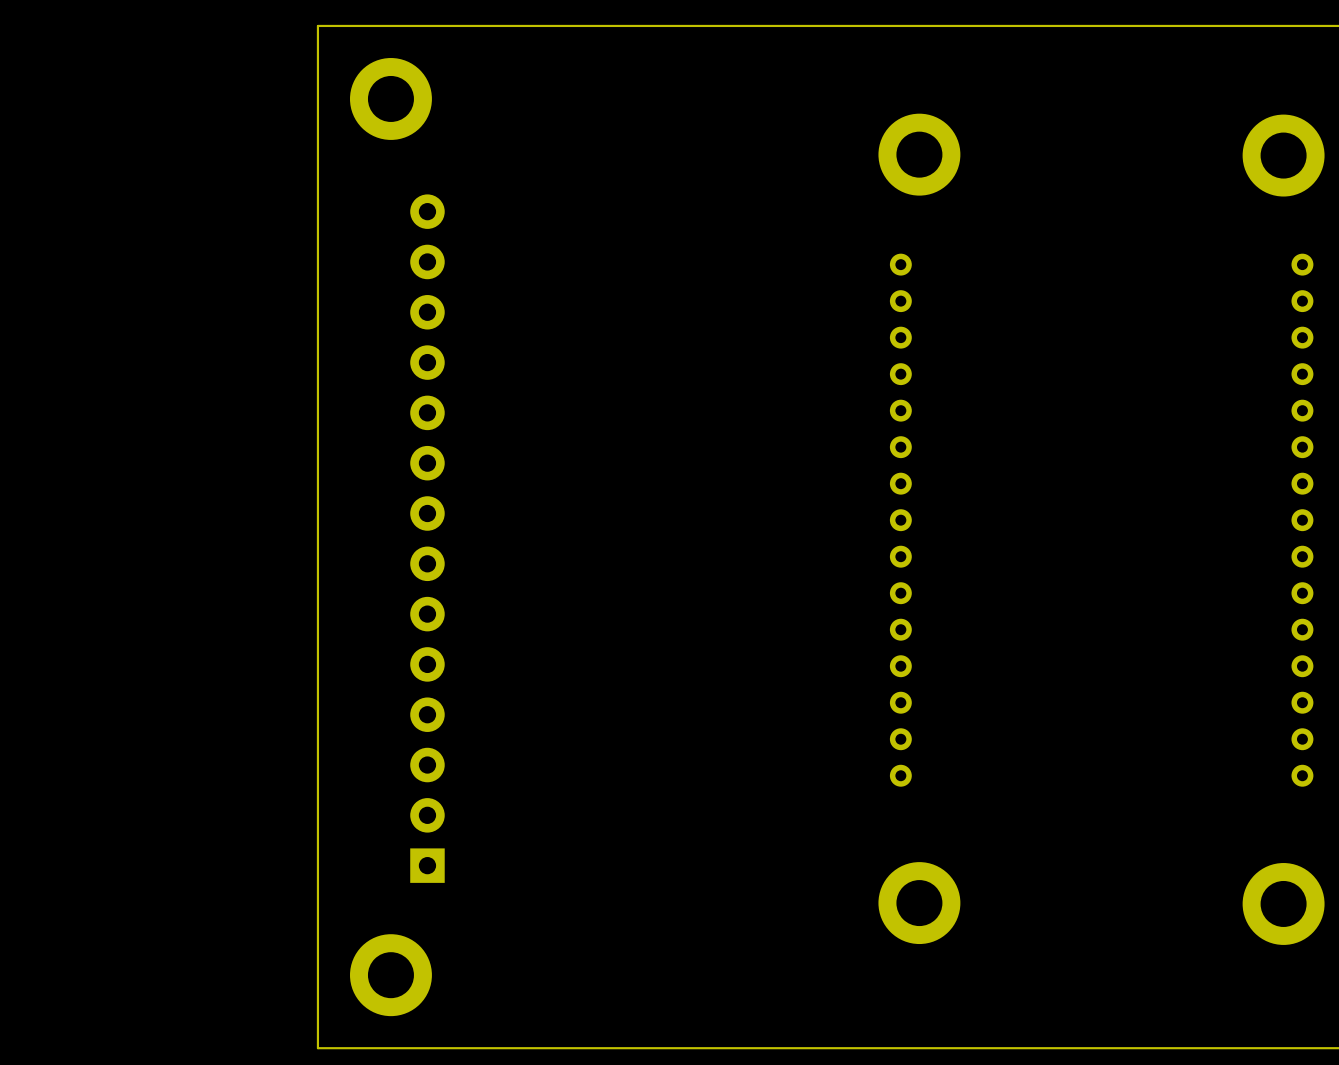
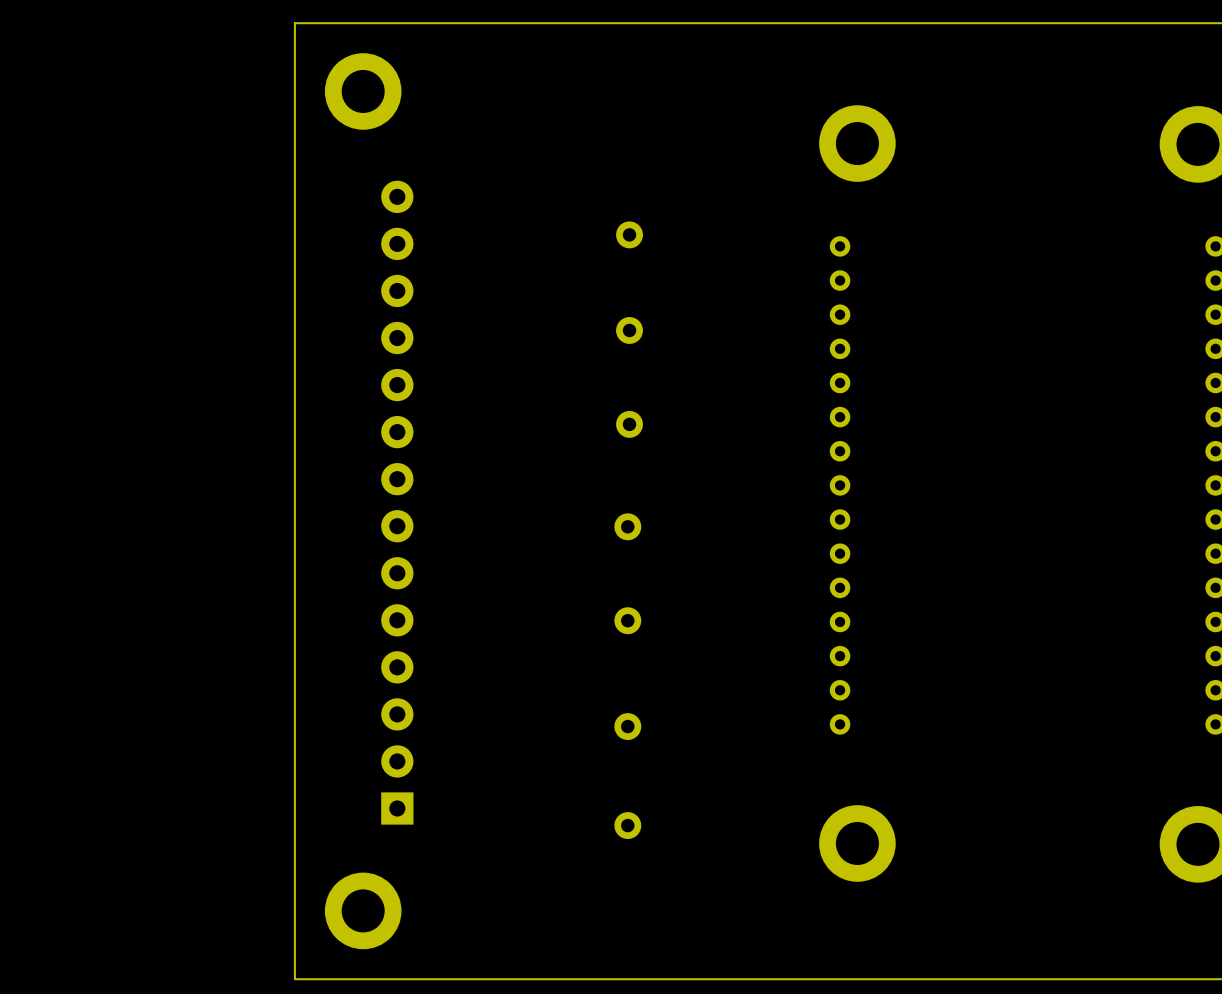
part: none -> (629, 234)
part: none -> (629, 330)
part: none -> (629, 424)
part: none -> (627, 526)
part: none -> (627, 620)
part: none -> (627, 726)
part: none -> (627, 825)

